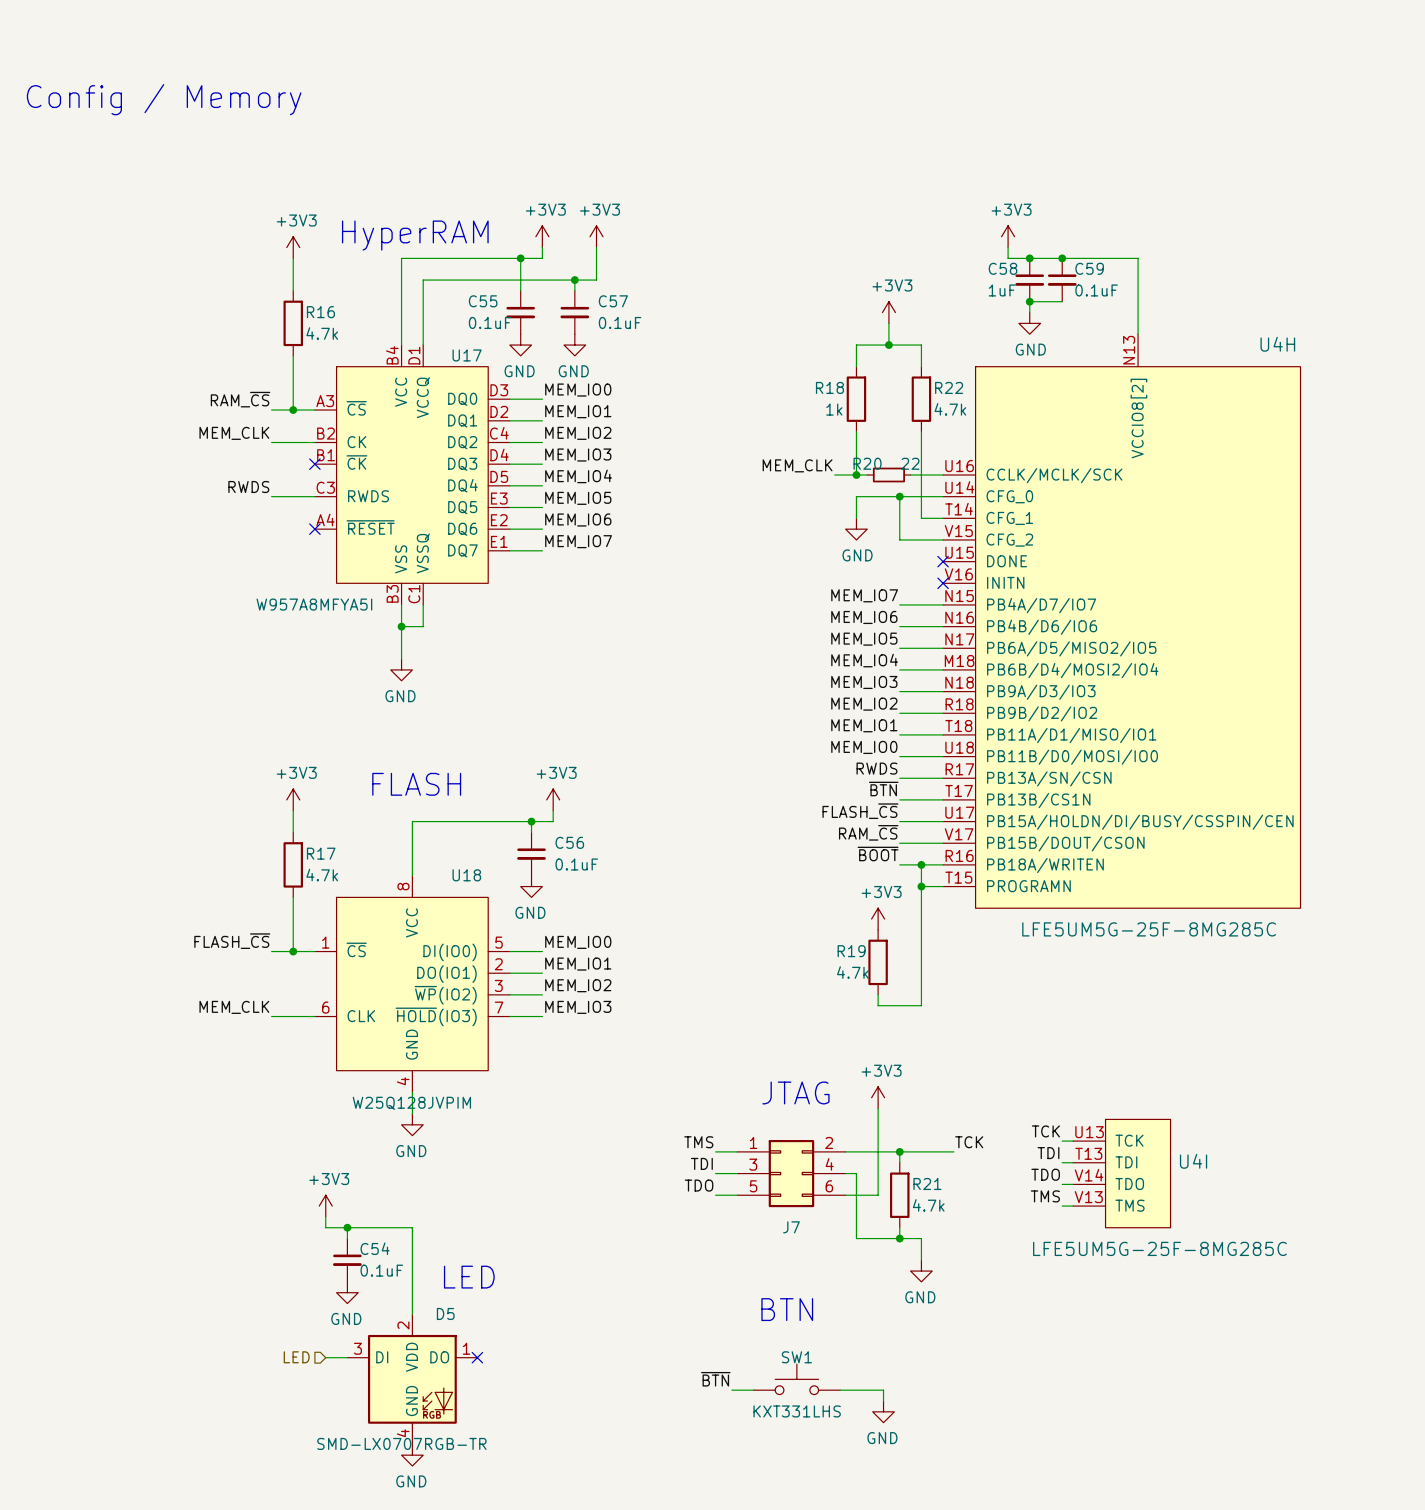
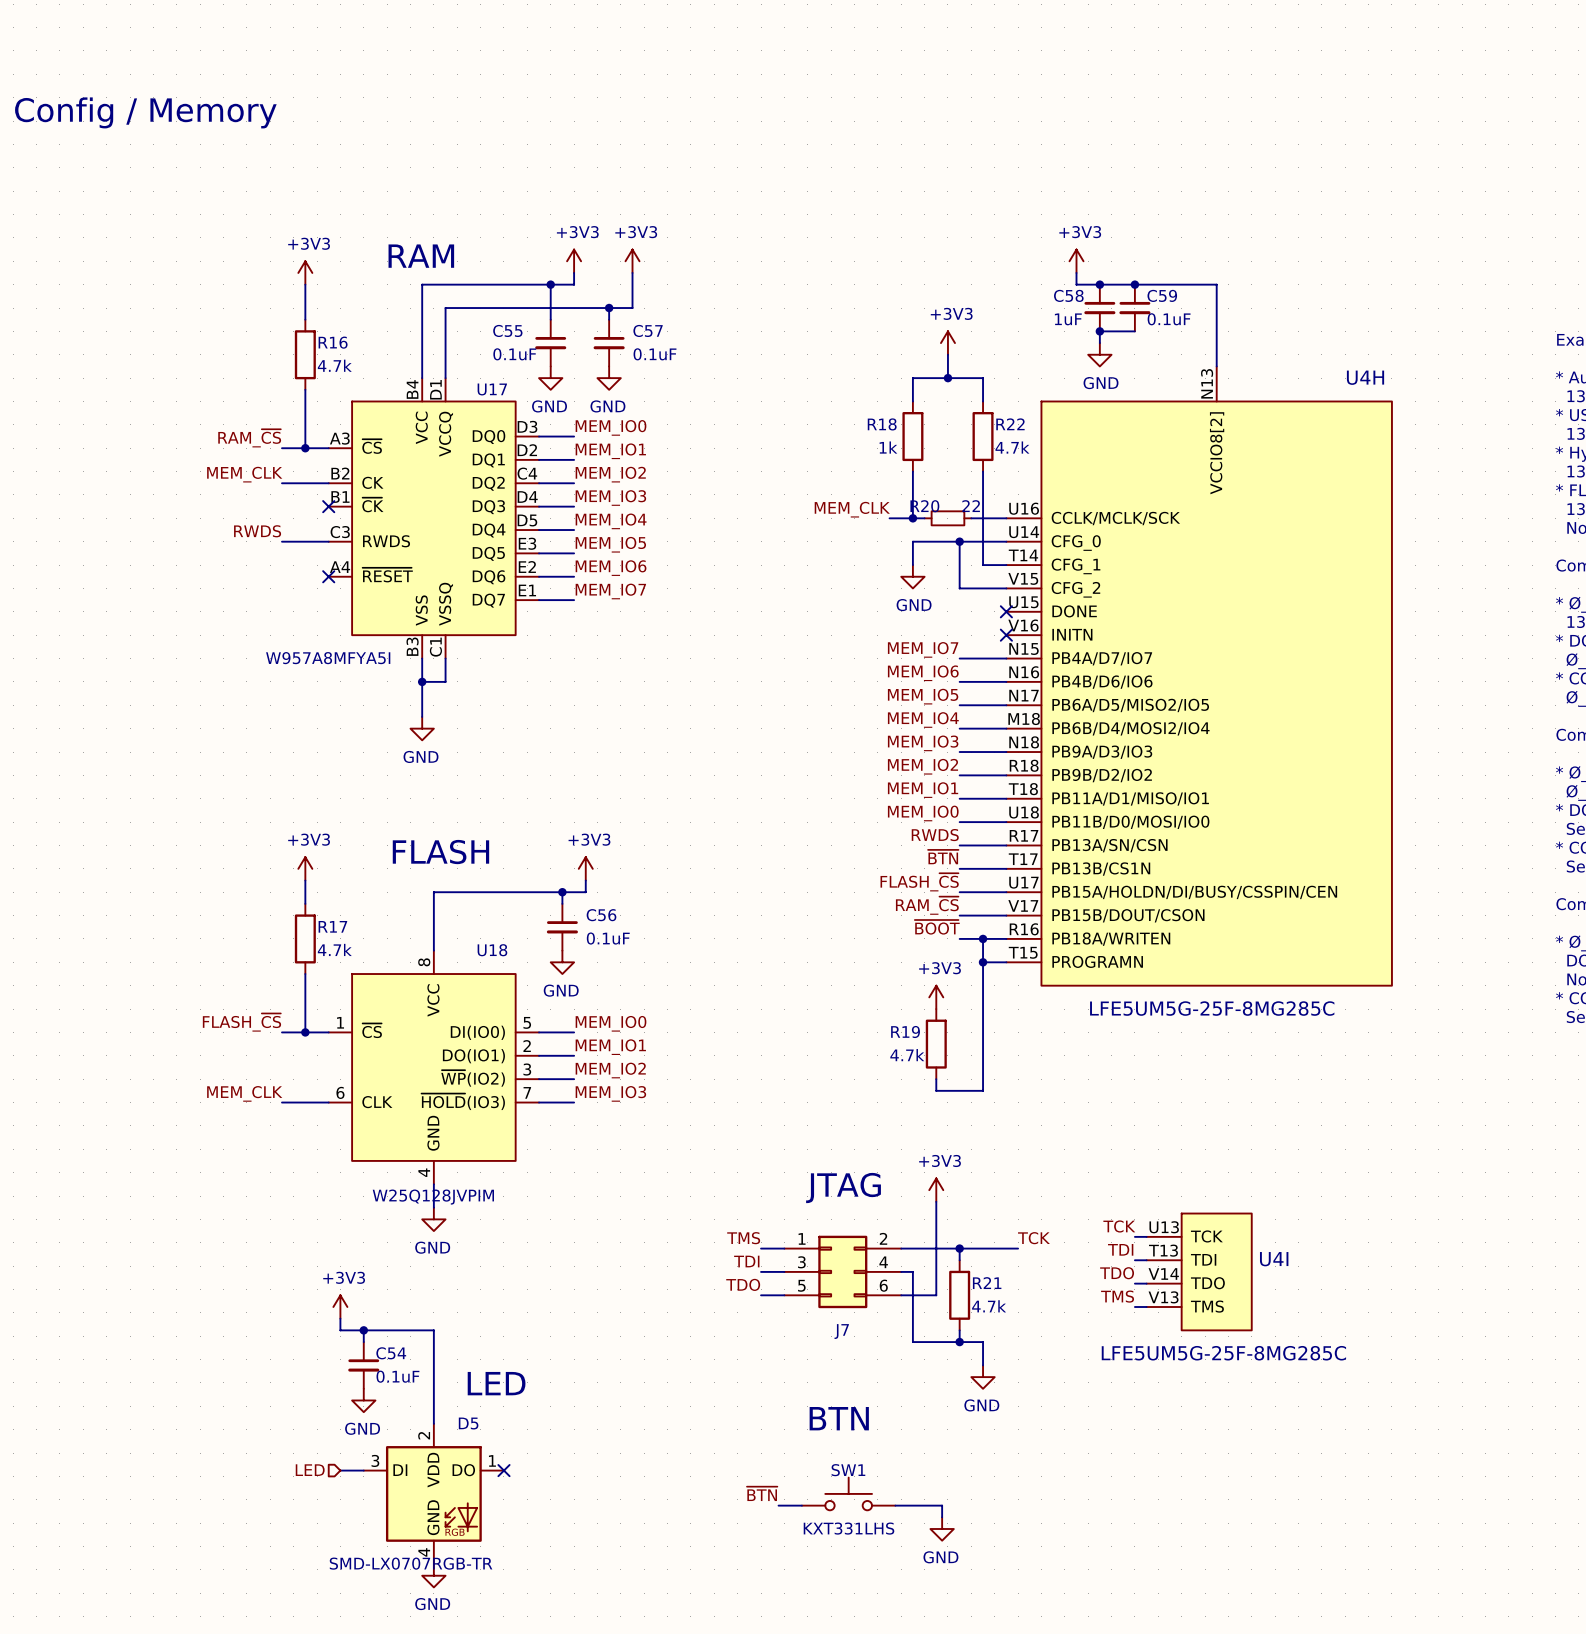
text: none -> RAM (421, 256)
text: HyperRAM (415, 235) -> none

